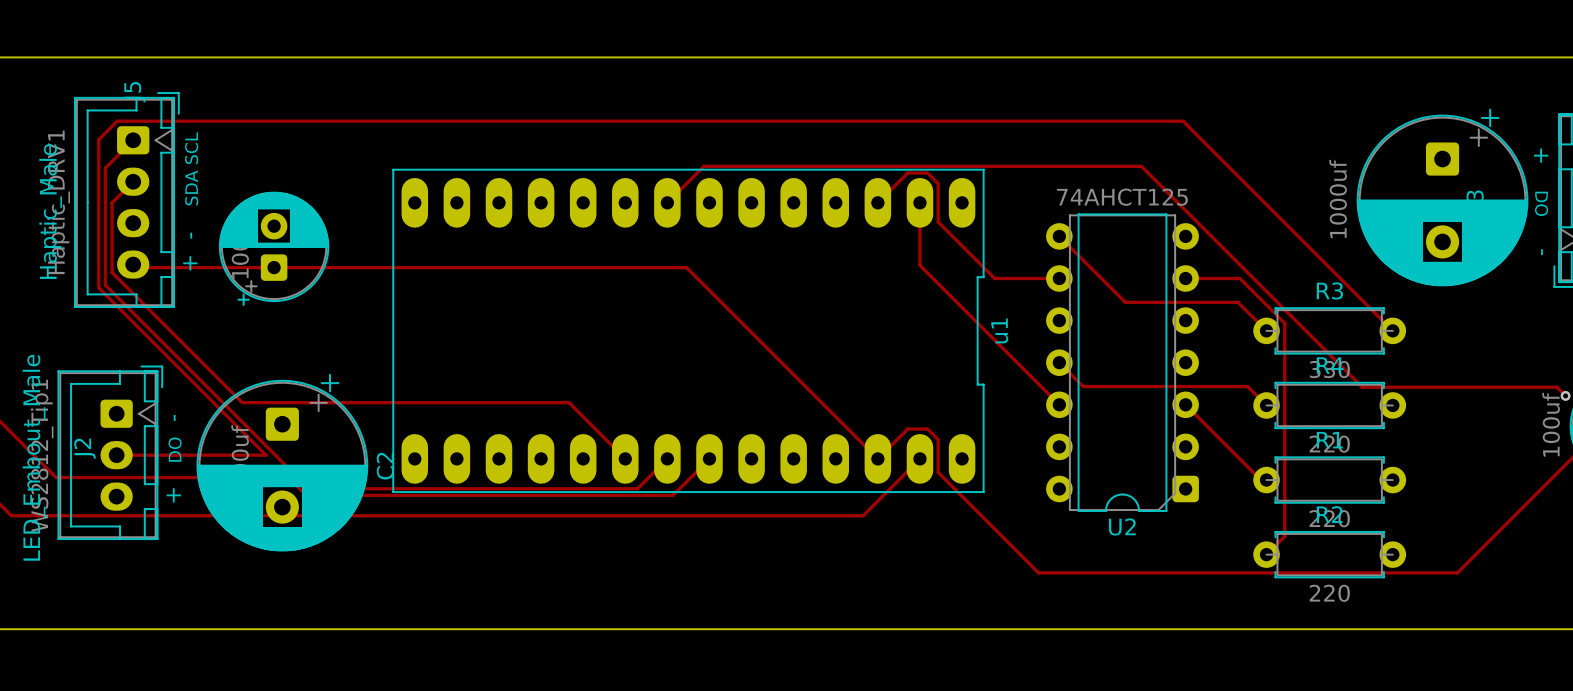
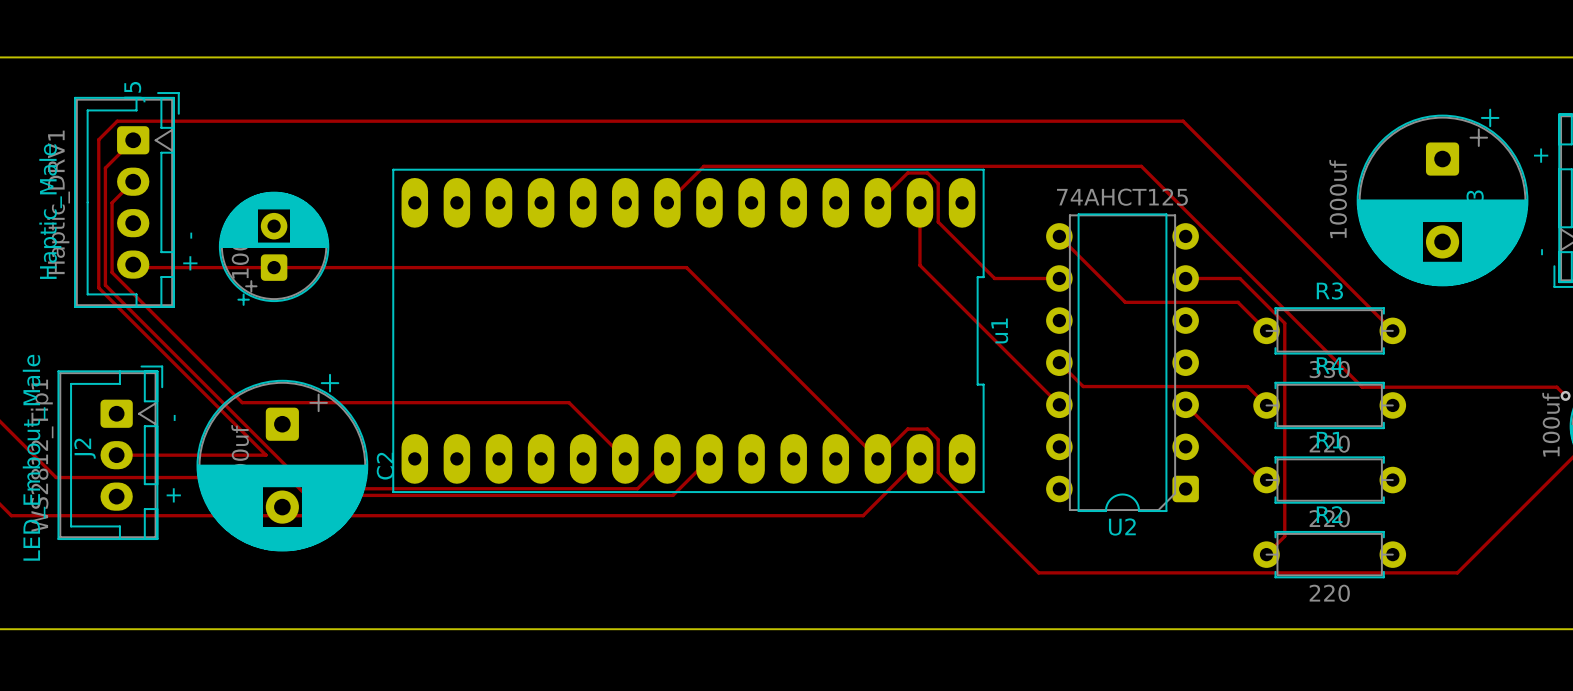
text: SCL (191, 148) -> none
text: SDA (191, 187) -> none
text: DO (1541, 203) -> none
text: DO (175, 449) -> none

